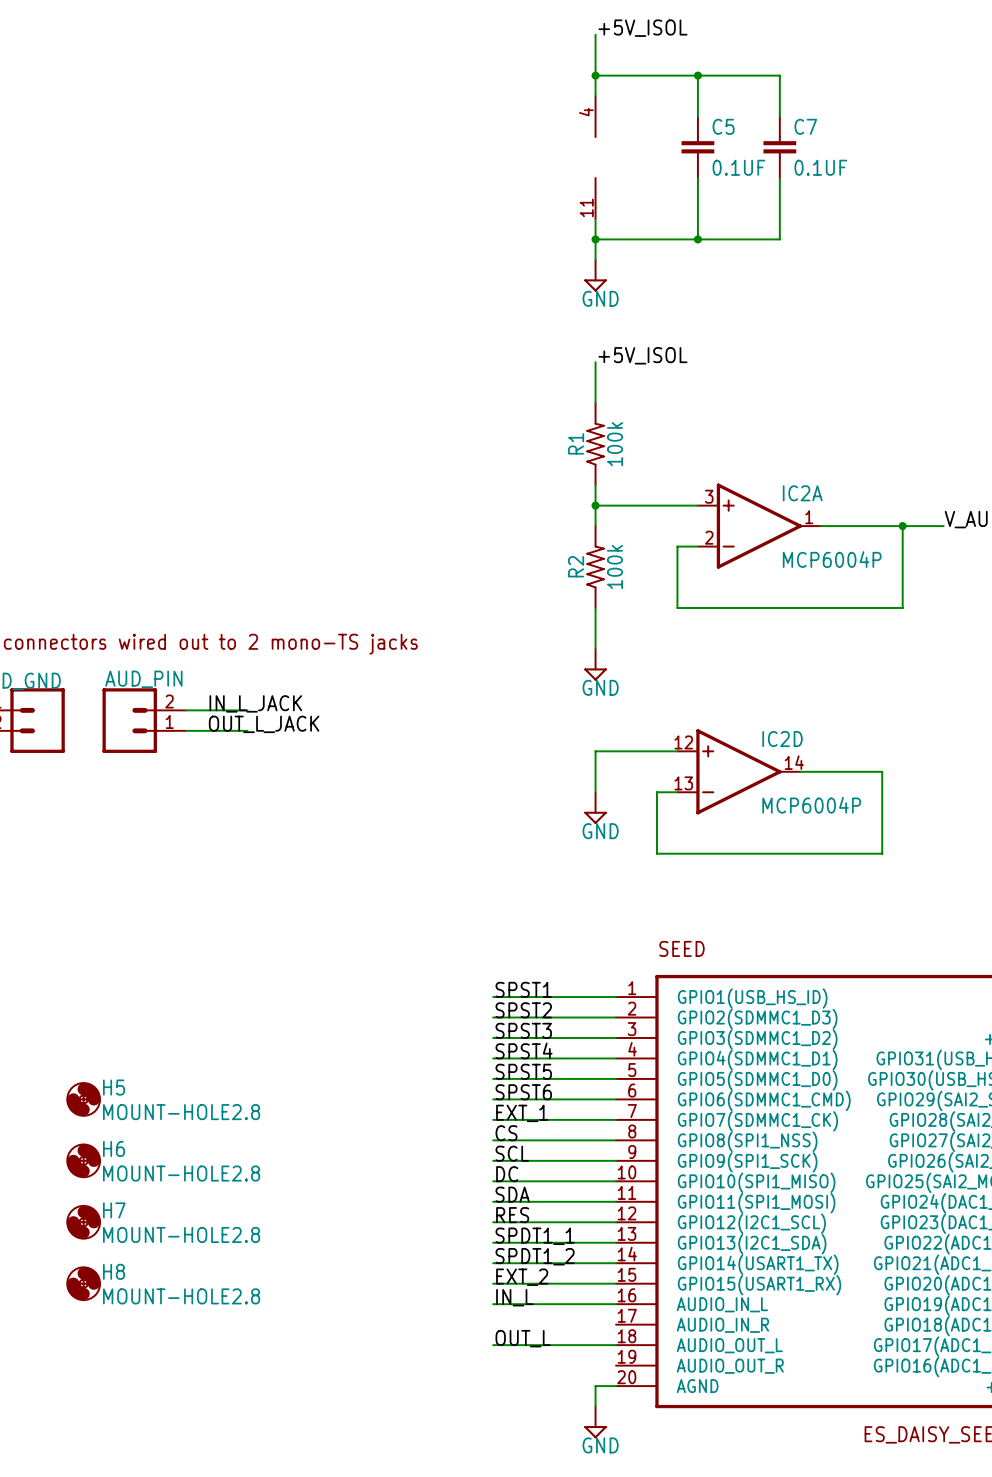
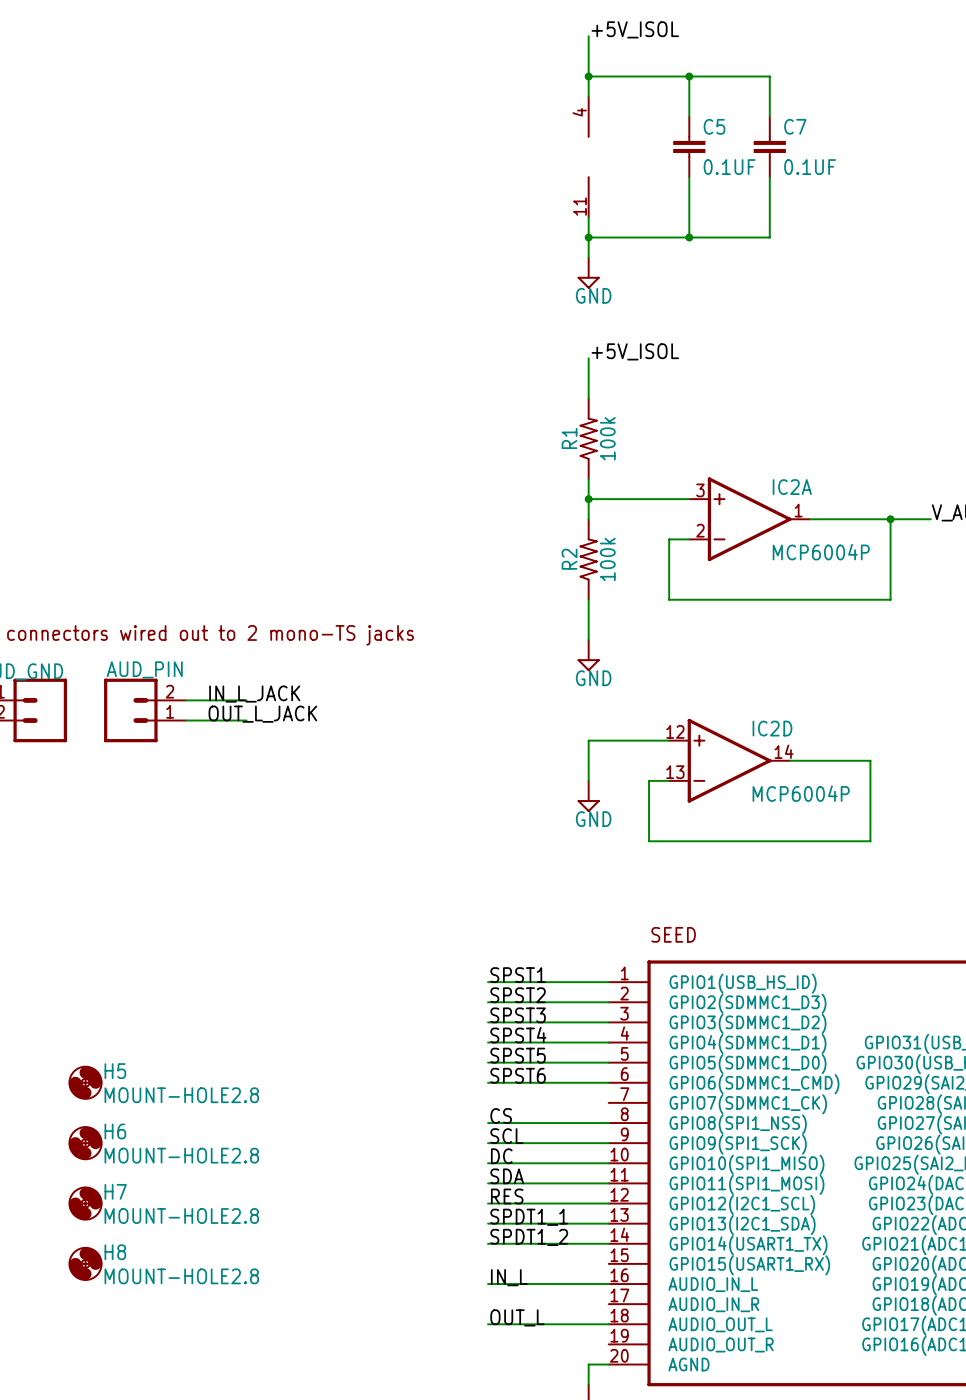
label: EXT_1 (522, 1113) -> none
wire: (493, 1119) (616, 1119) -> none
label: EXT_2 (522, 1277) -> none
wire: (493, 1283) (616, 1283) -> none

